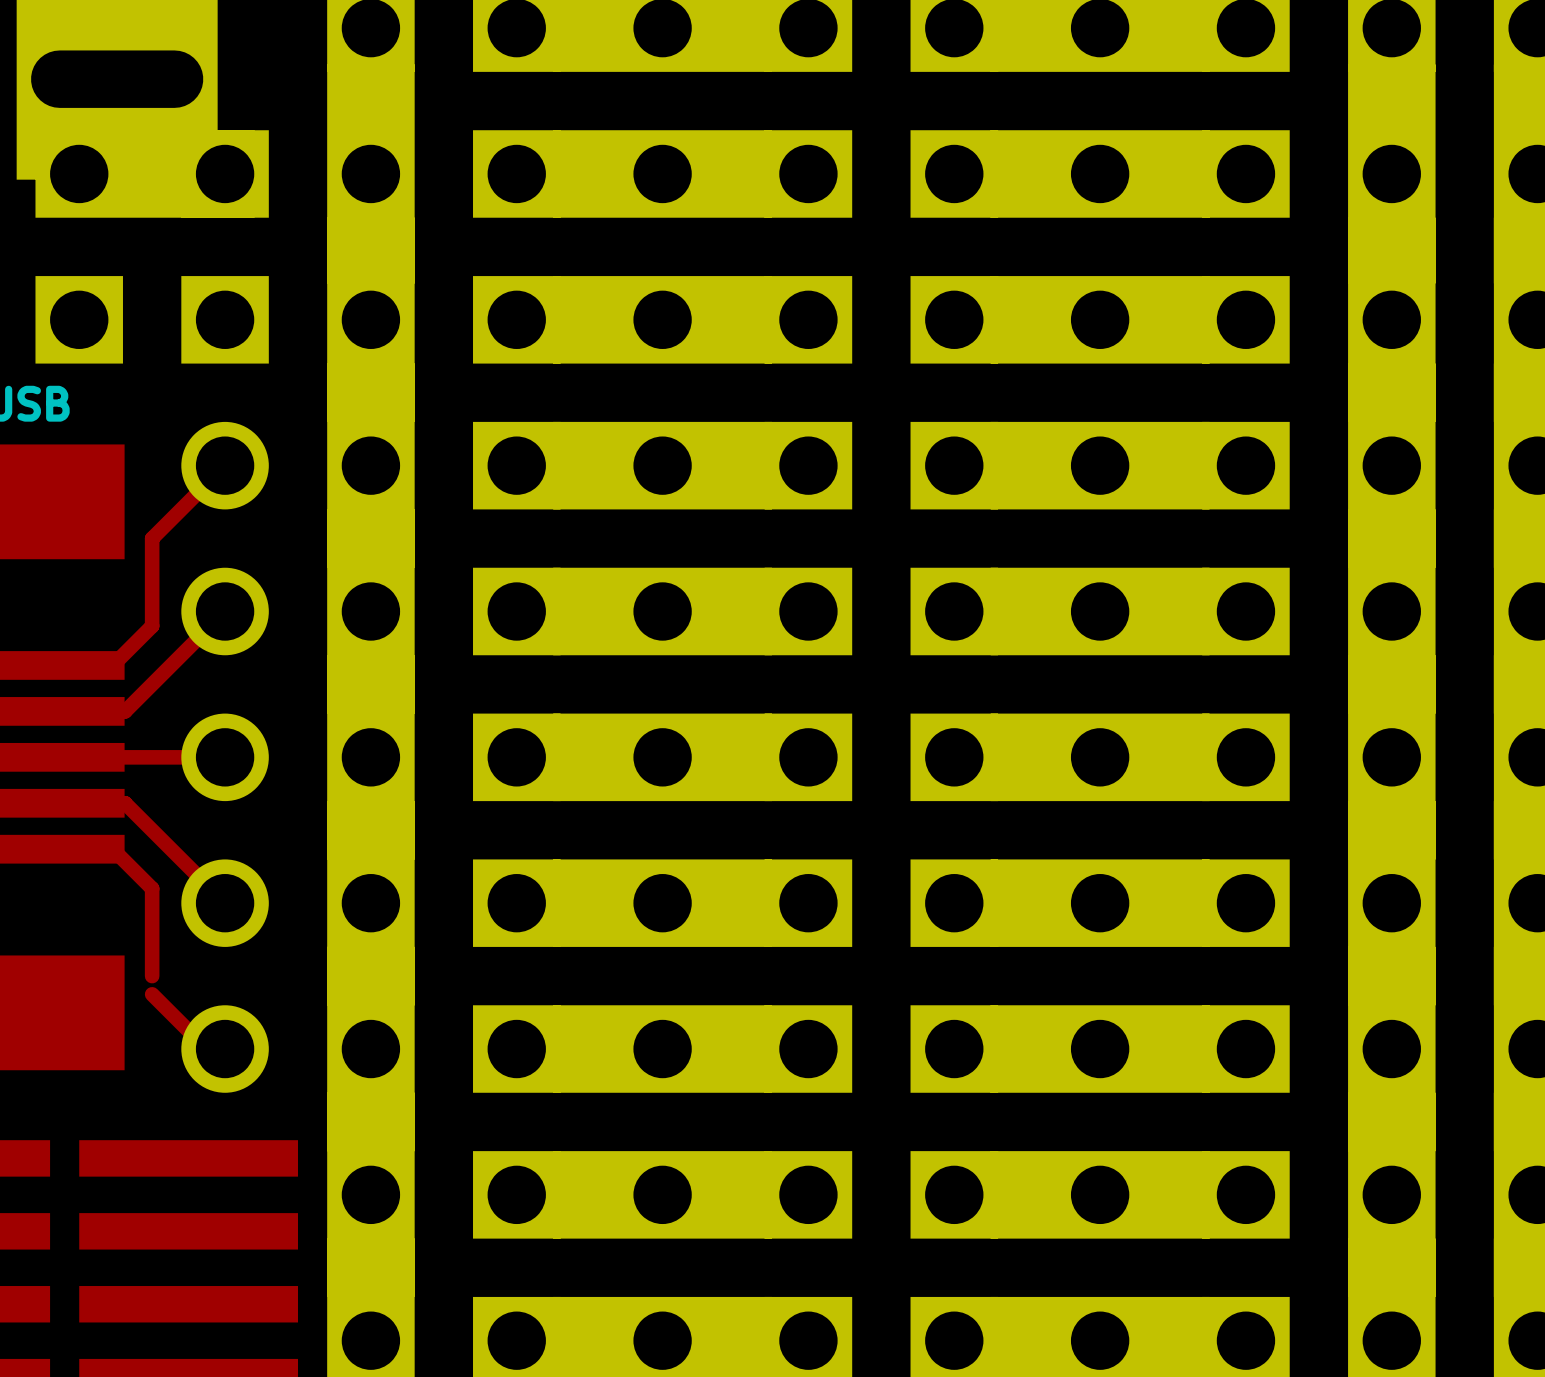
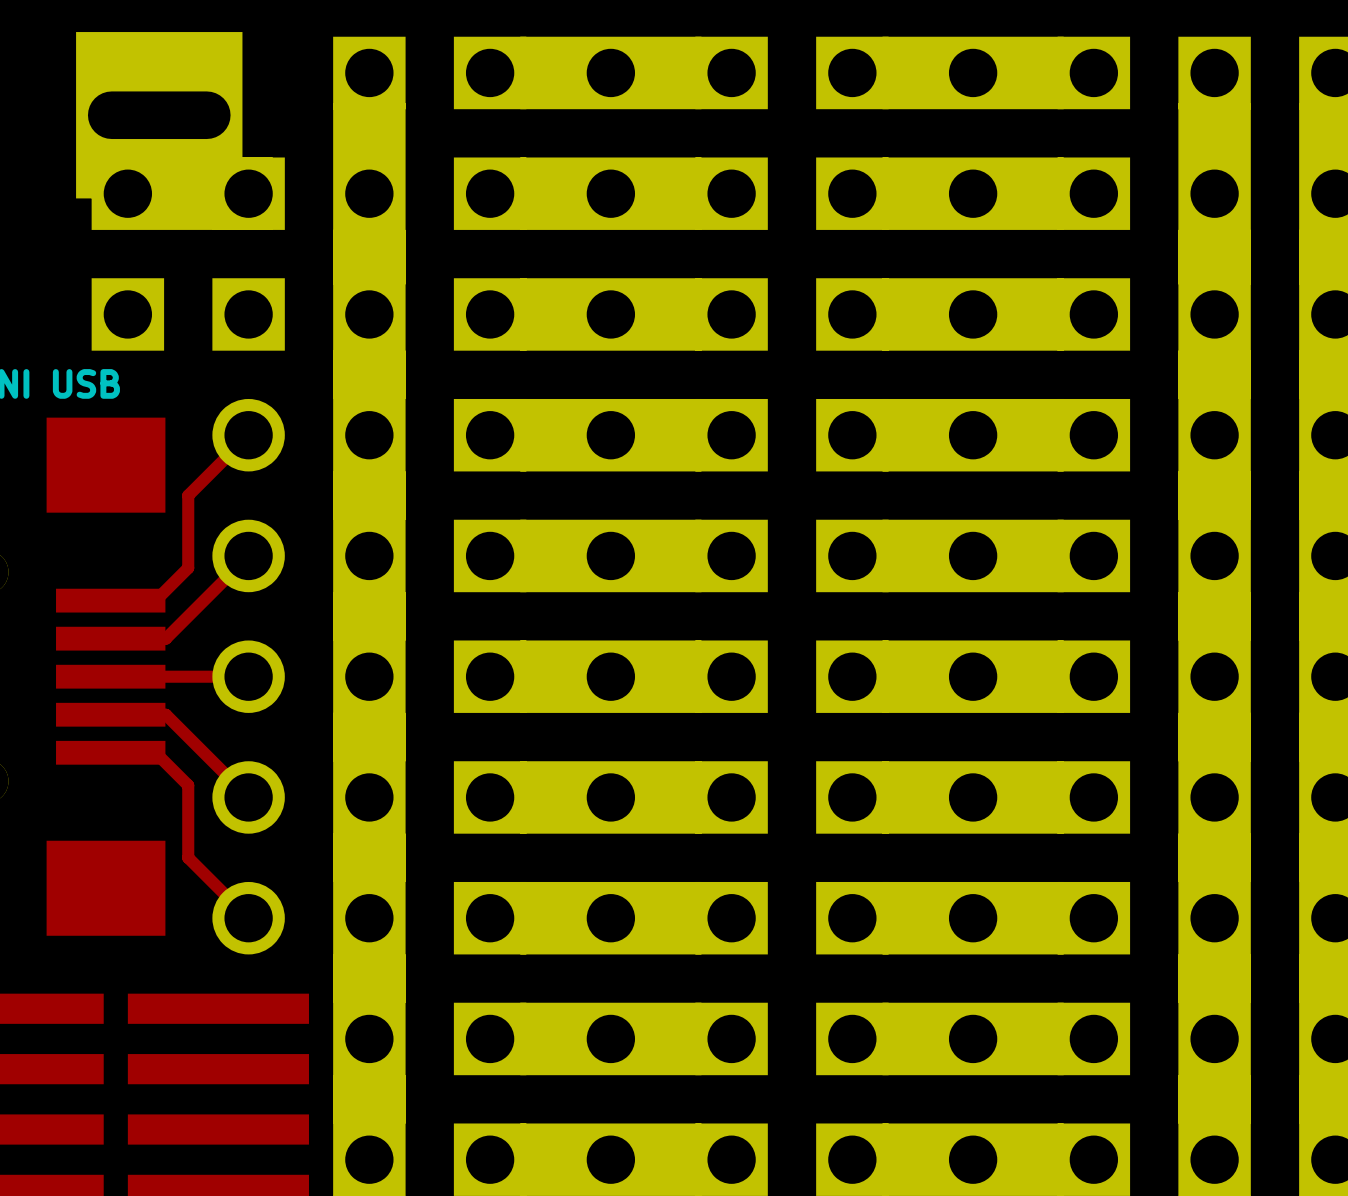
track: (152, 994) (225, 1067) -> (188, 857) (248, 918)

